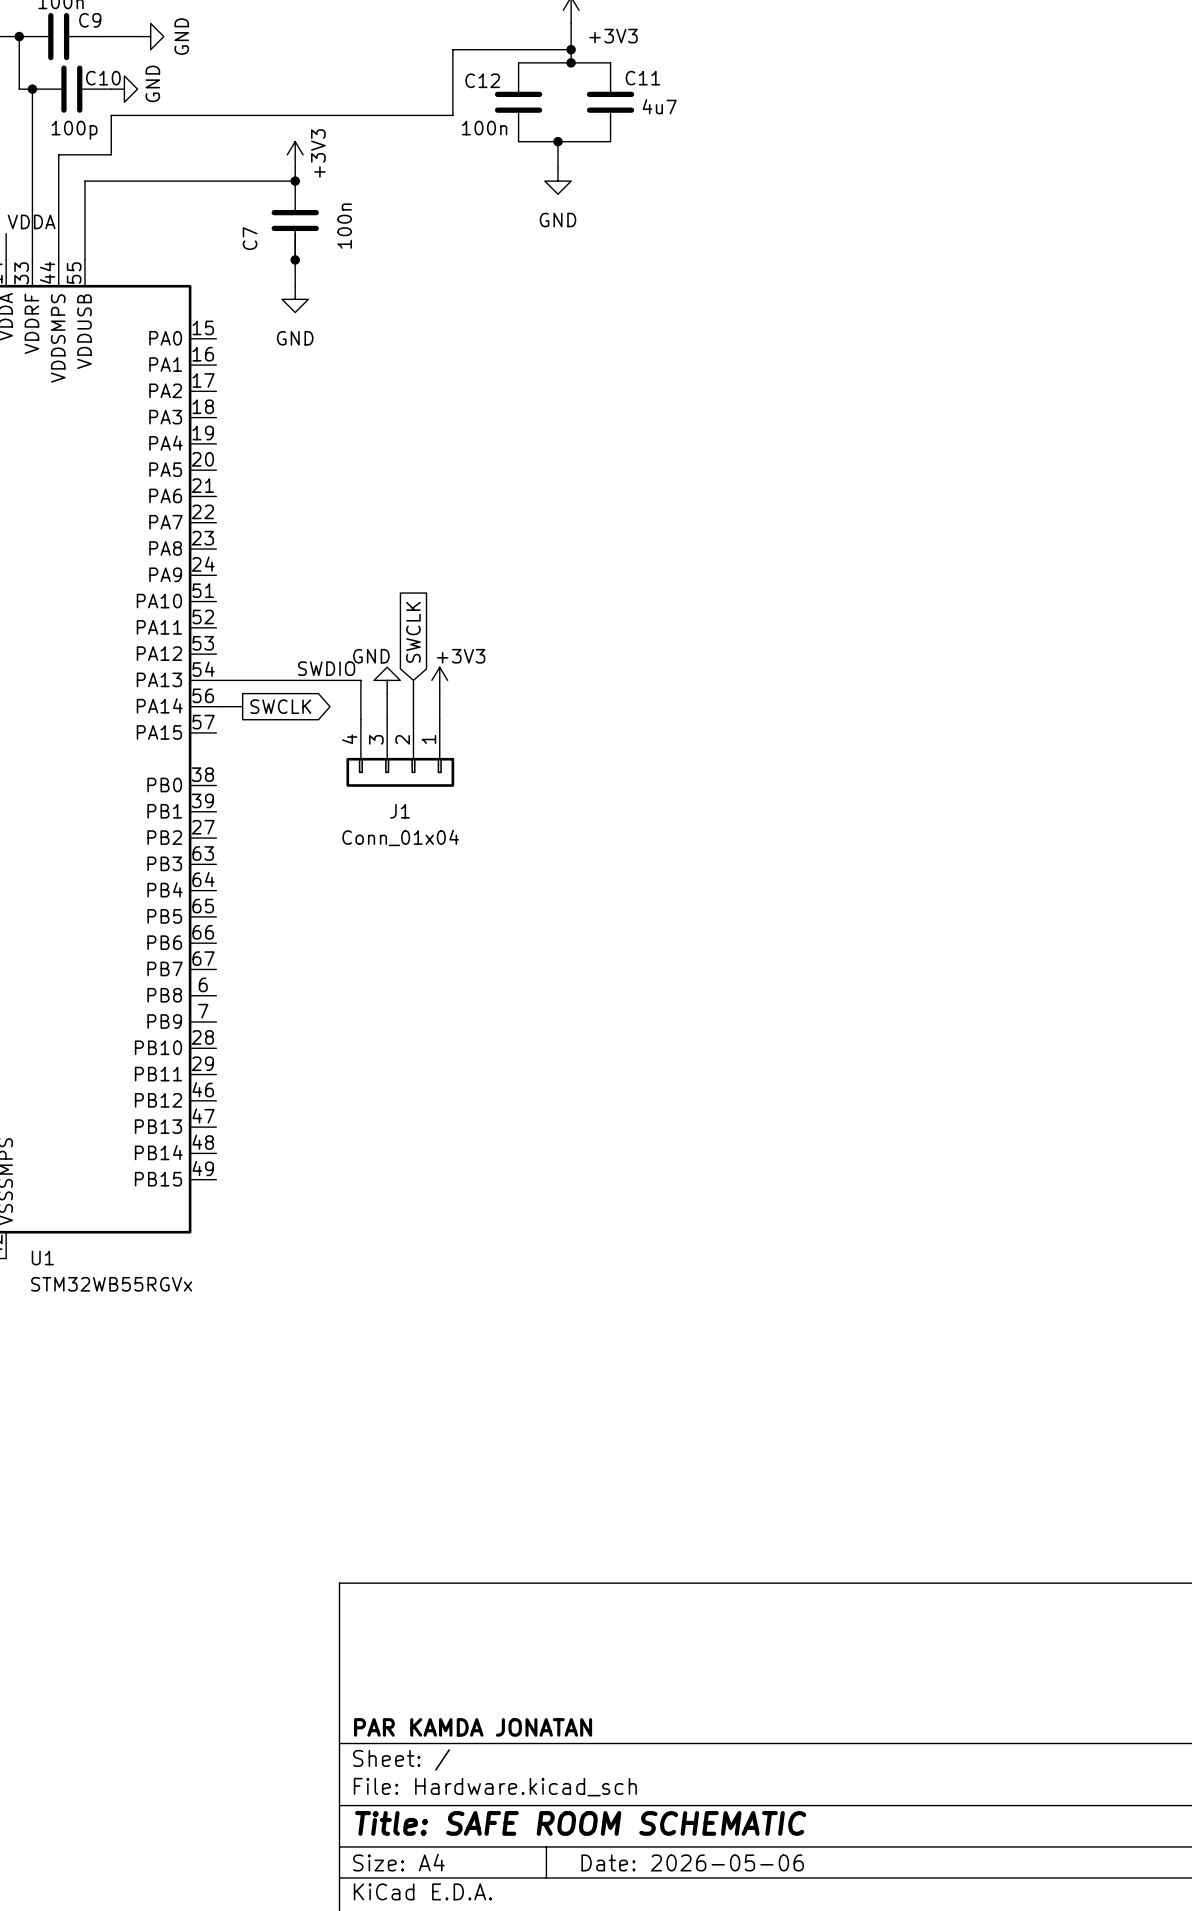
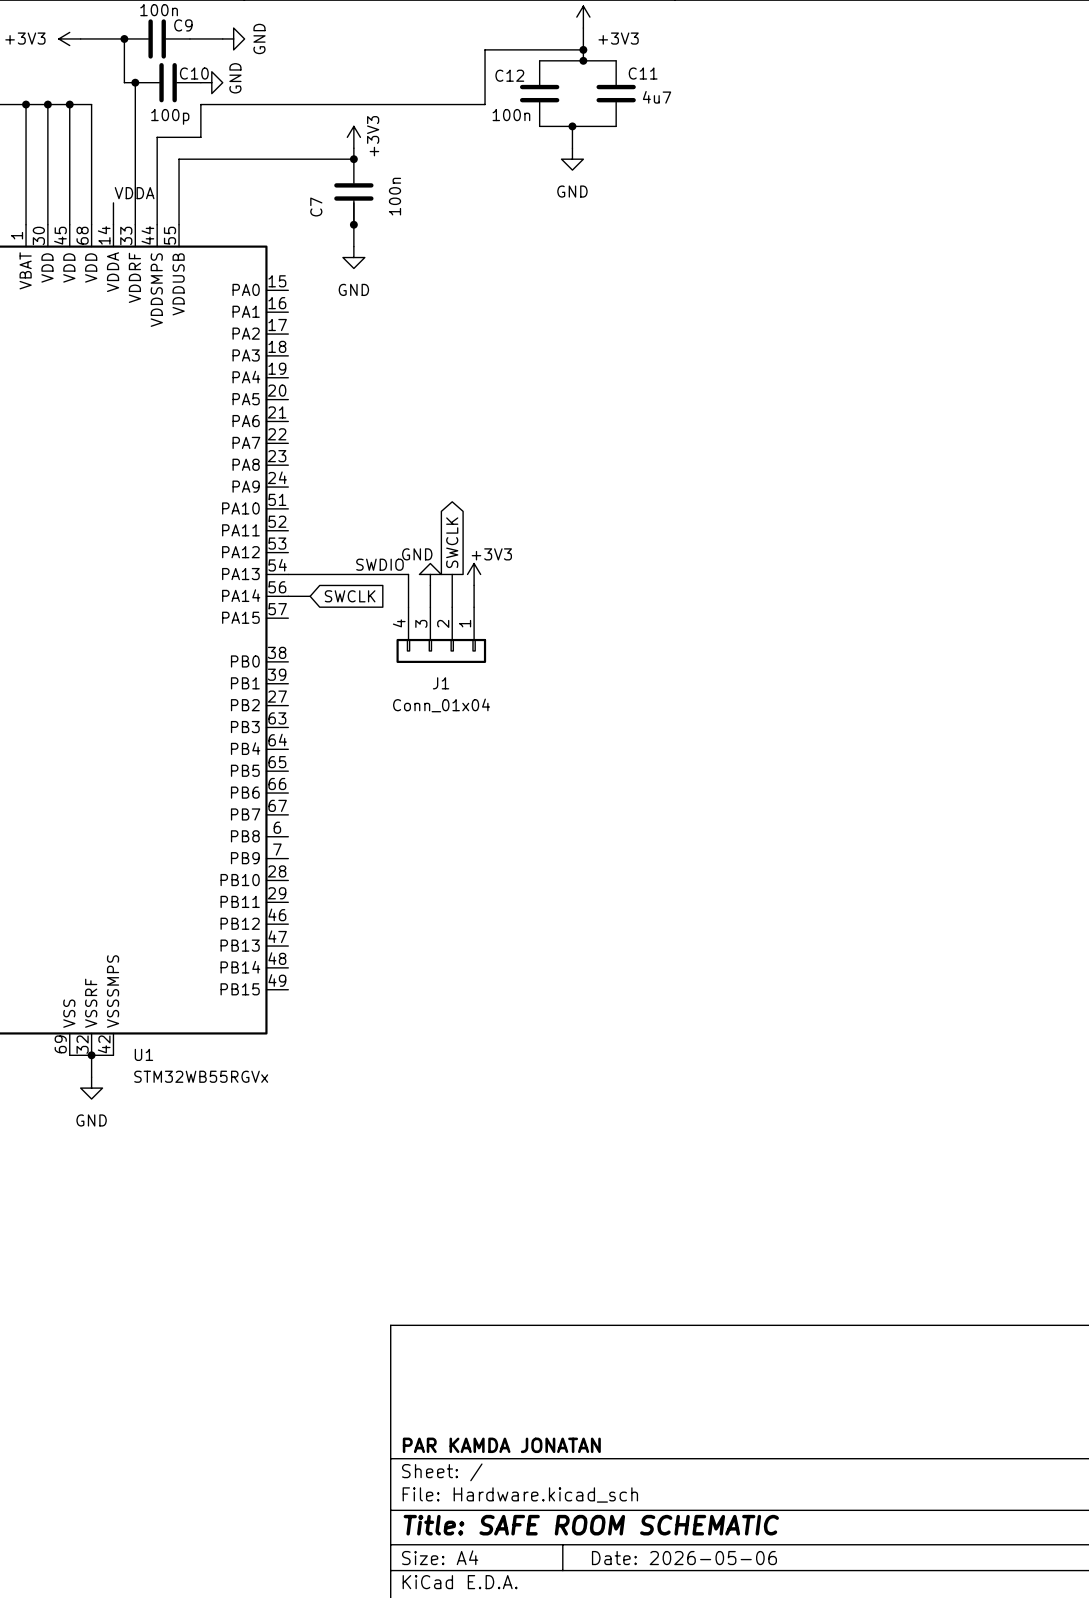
global label shape: input (413, 632) -> output (452, 542)
global label shape: output (280, 706) -> input (350, 596)

